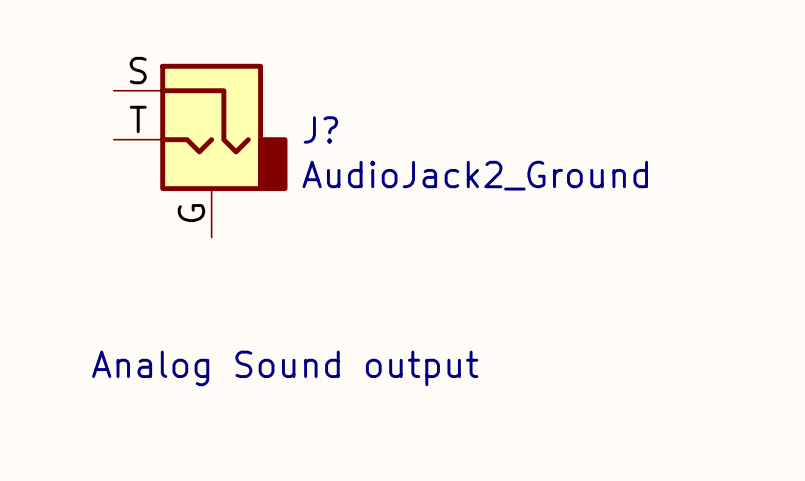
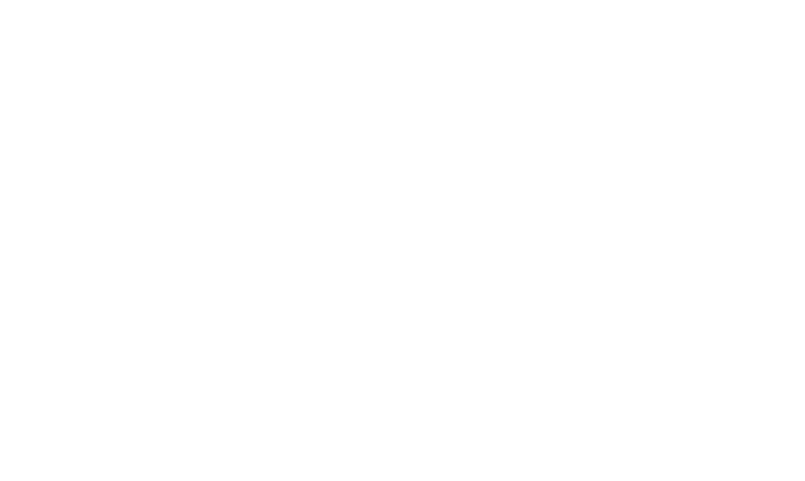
J?: AudioJack2_Ground (200, 150) -> none
text: Analog Sound output (285, 368) -> none

